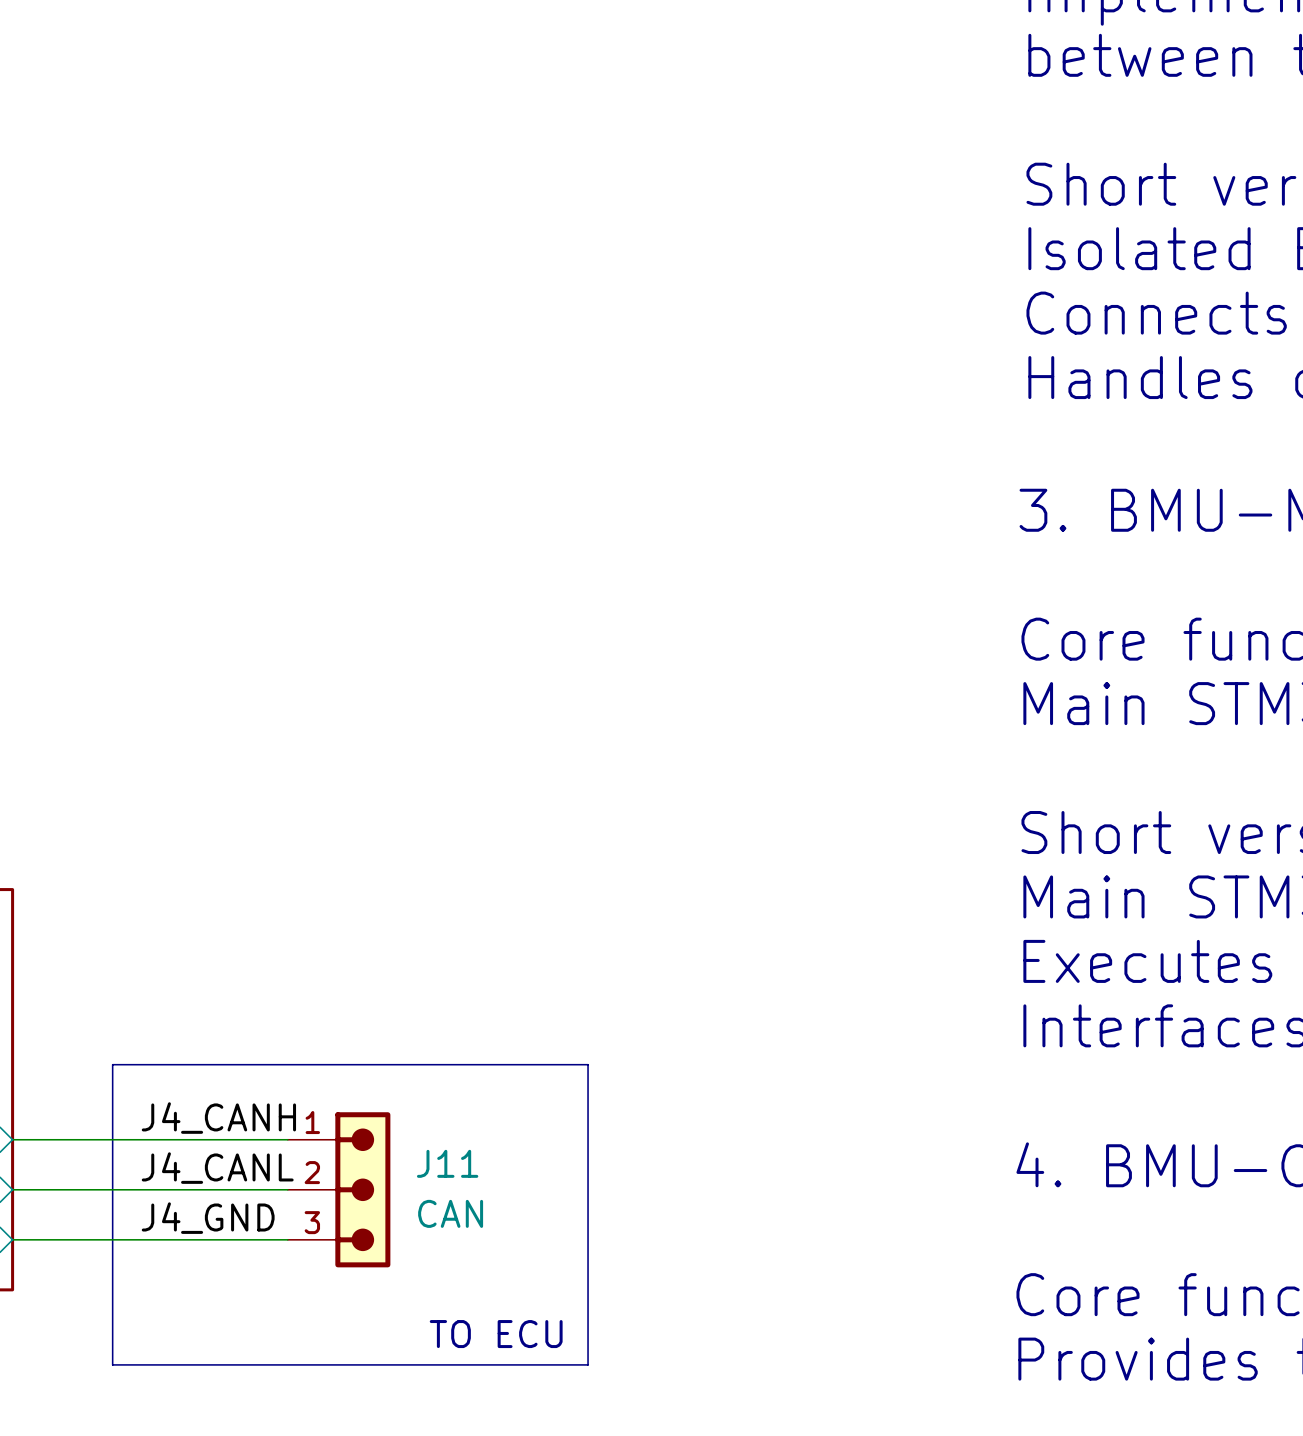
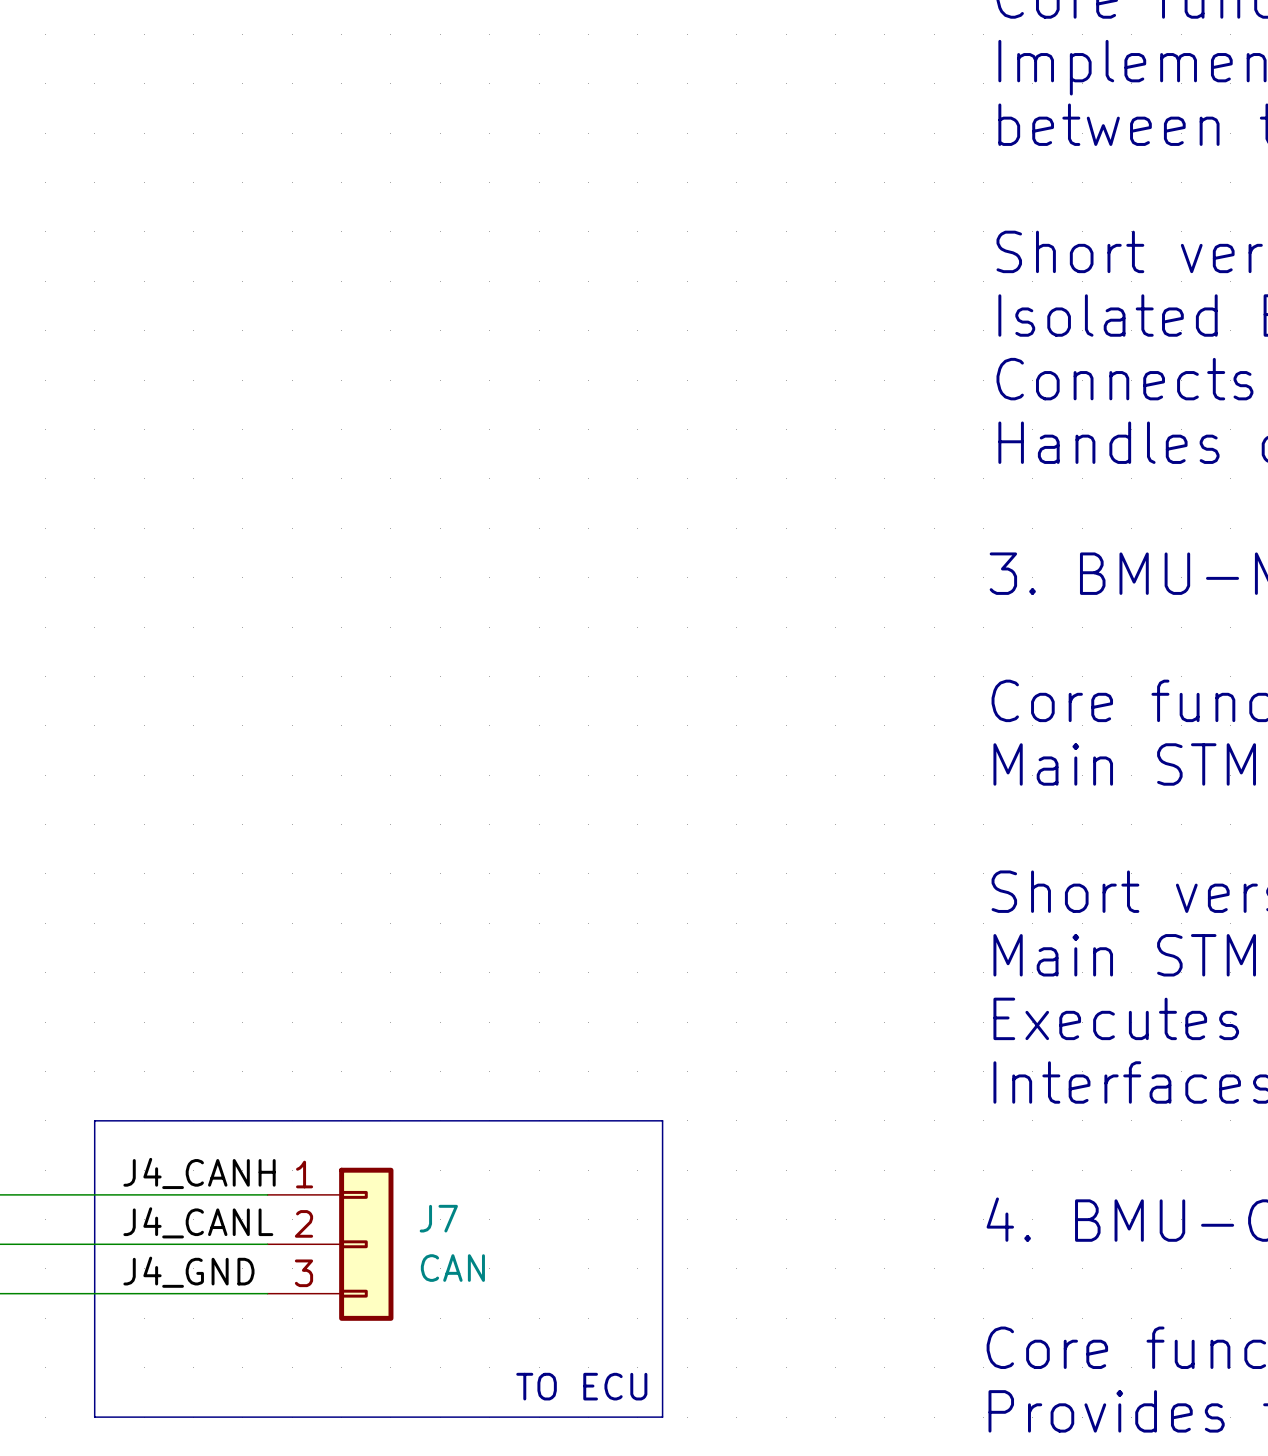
line: (588, 1064) (588, 1364) -> (563, 1120) (662, 1120) (662, 1417) (563, 1417)
J11: CAN (339, 1189) -> none
J7: none -> CAN (330, 1244)
text position: TO ECU (496, 1334) -> TO ECU (581, 1386)

